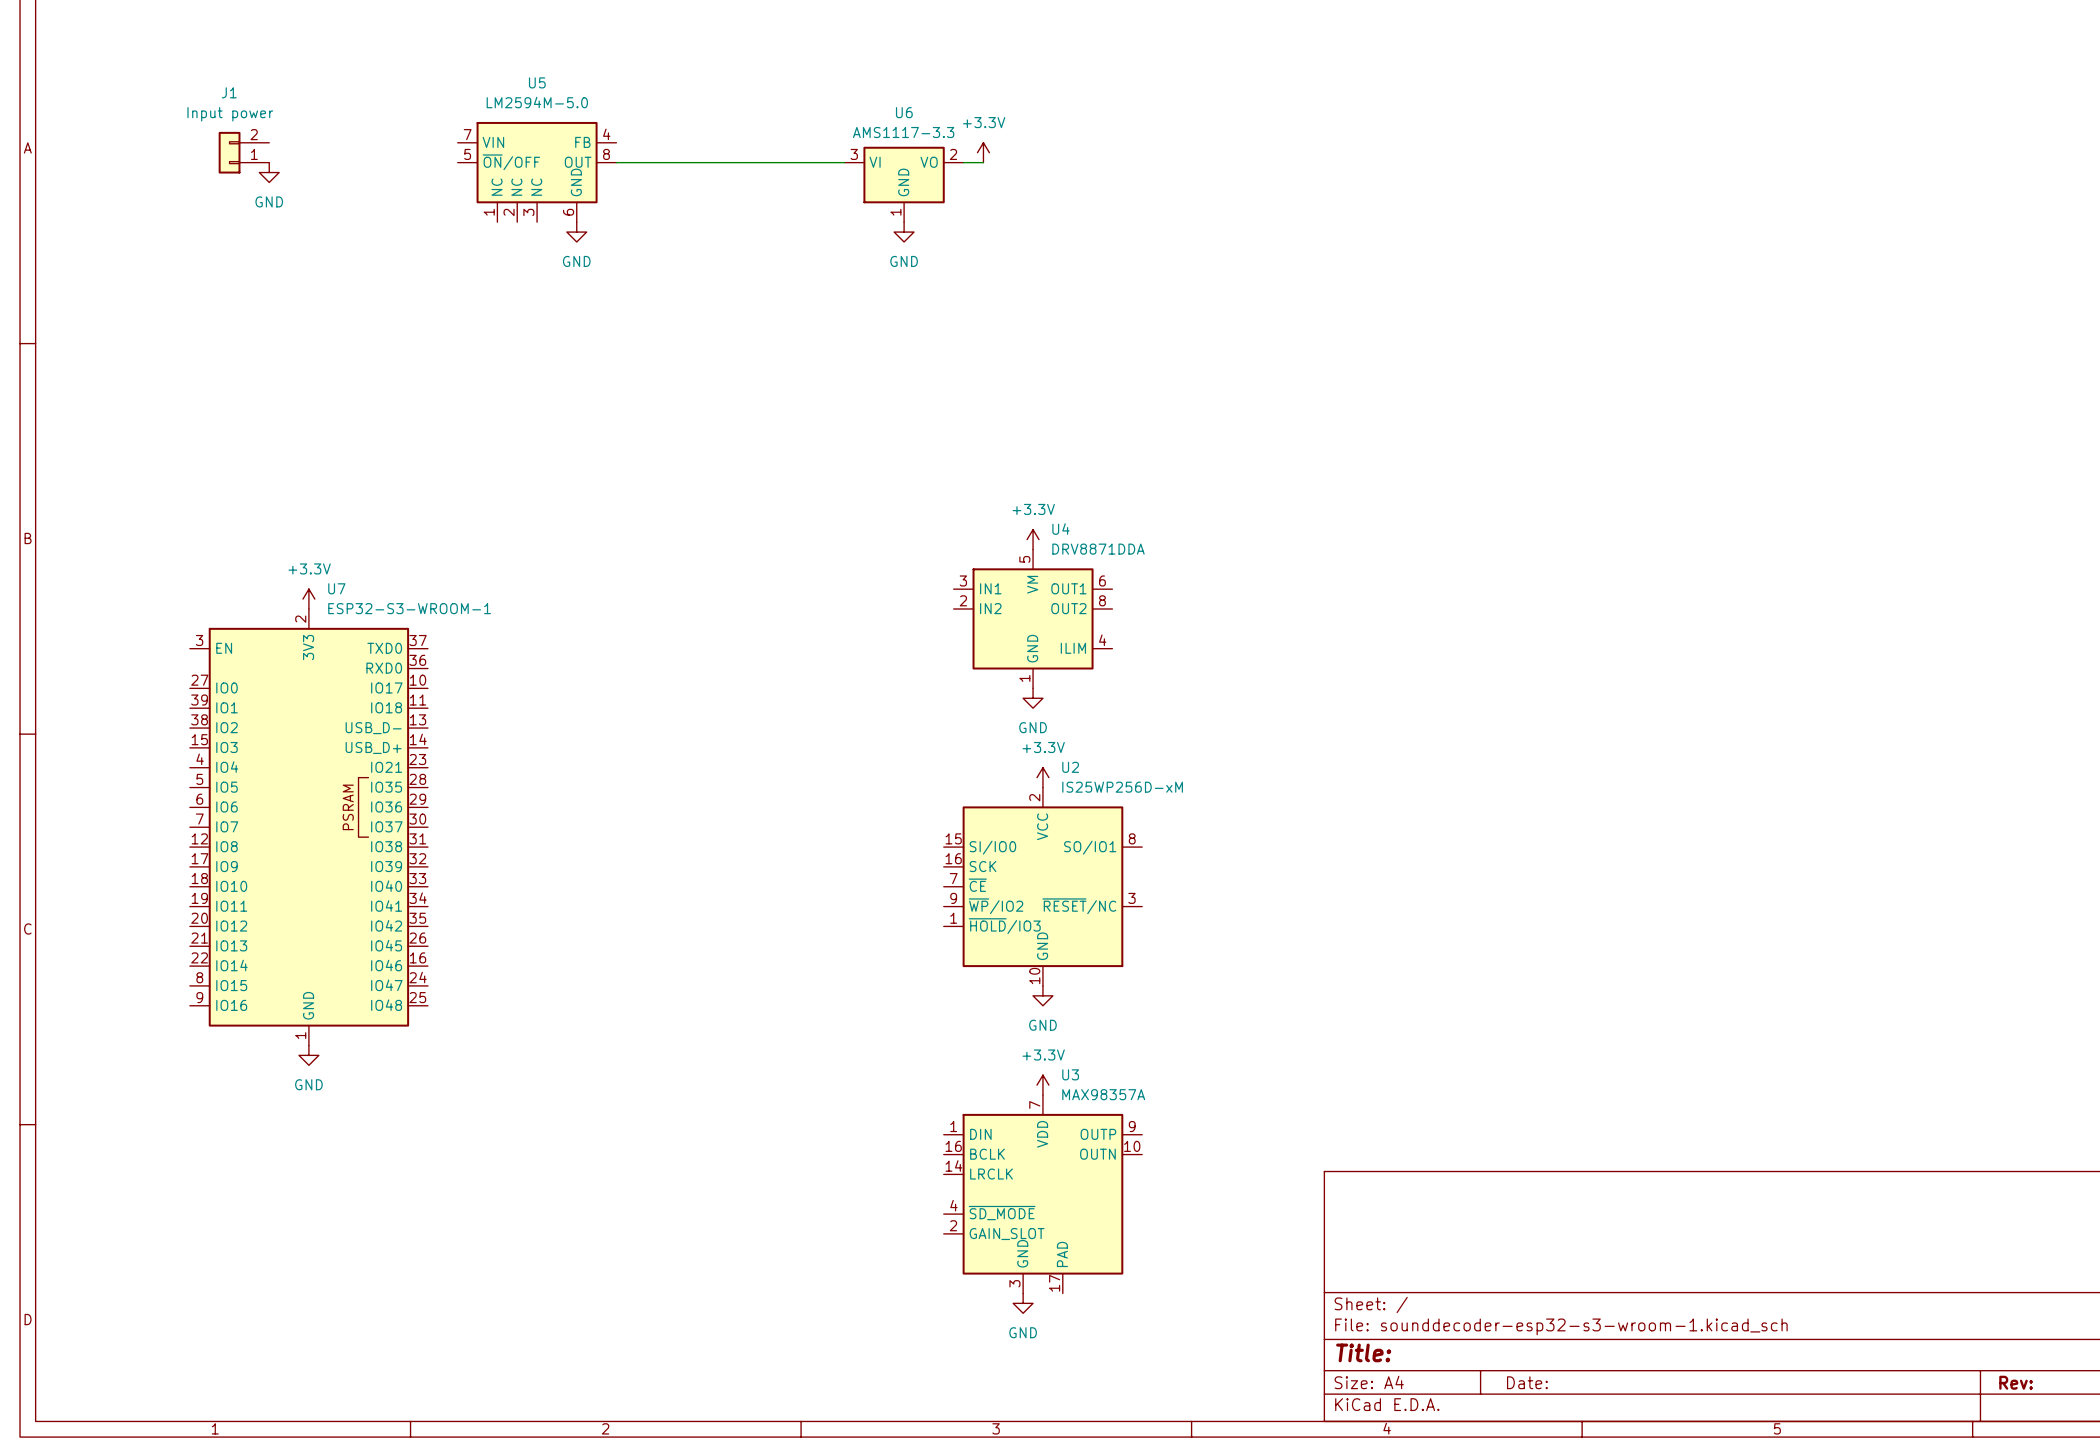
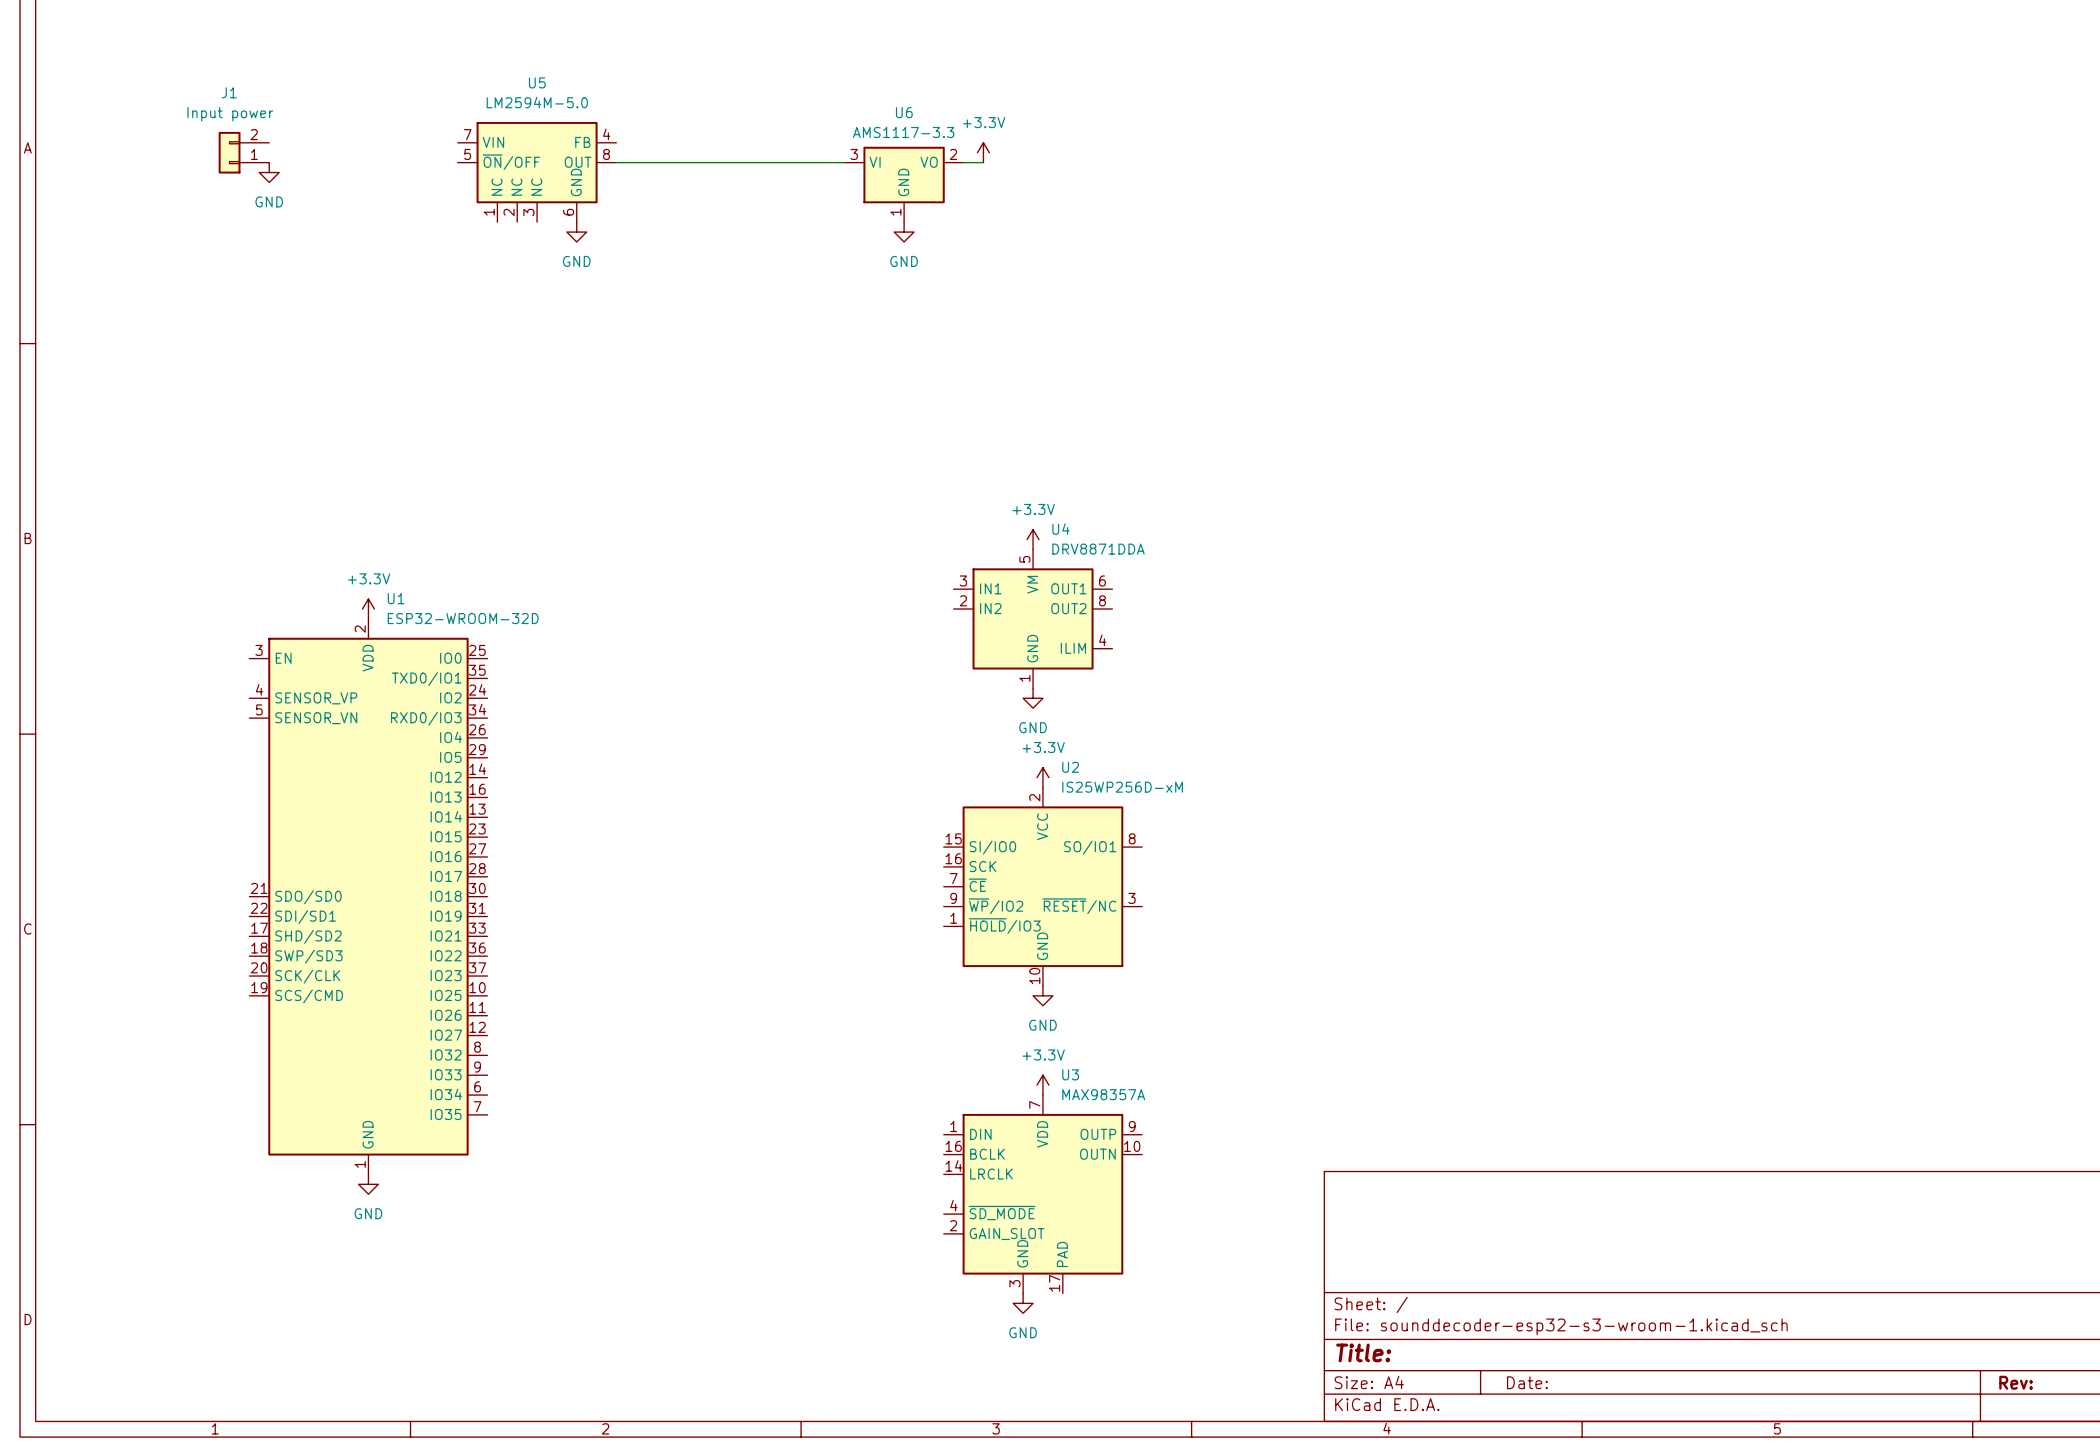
power symbol position: +3.3V (308, 599) -> +3.3V (368, 609)
U7: ESP32-S3-WROOM-1 (308, 827) -> none
U1: none -> ESP32-WROOM-32D (368, 896)
power symbol position: GND (308, 1055) -> GND (368, 1184)

